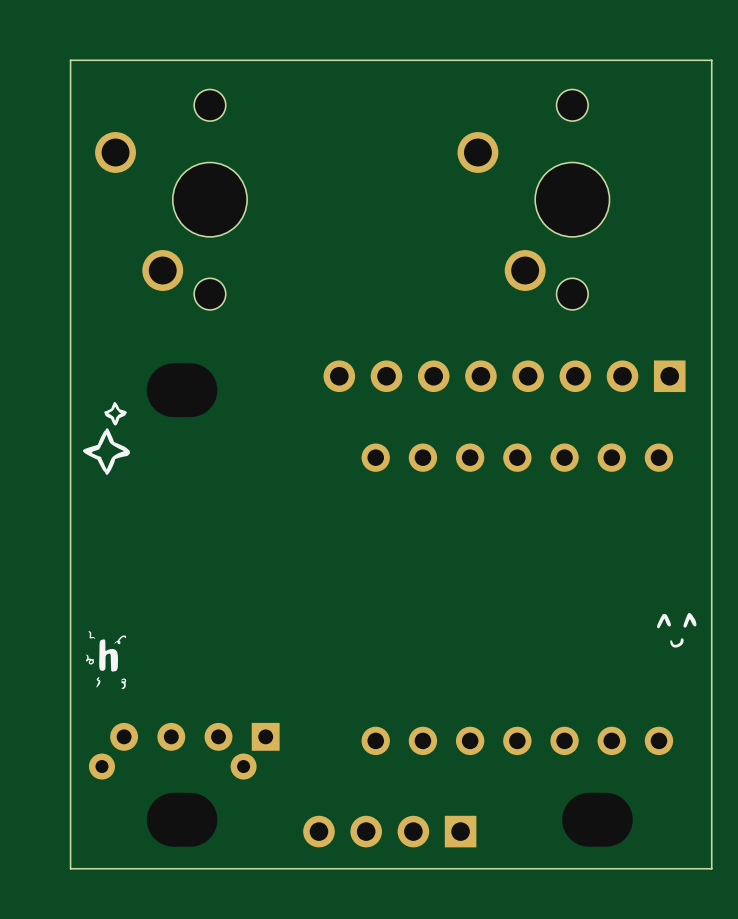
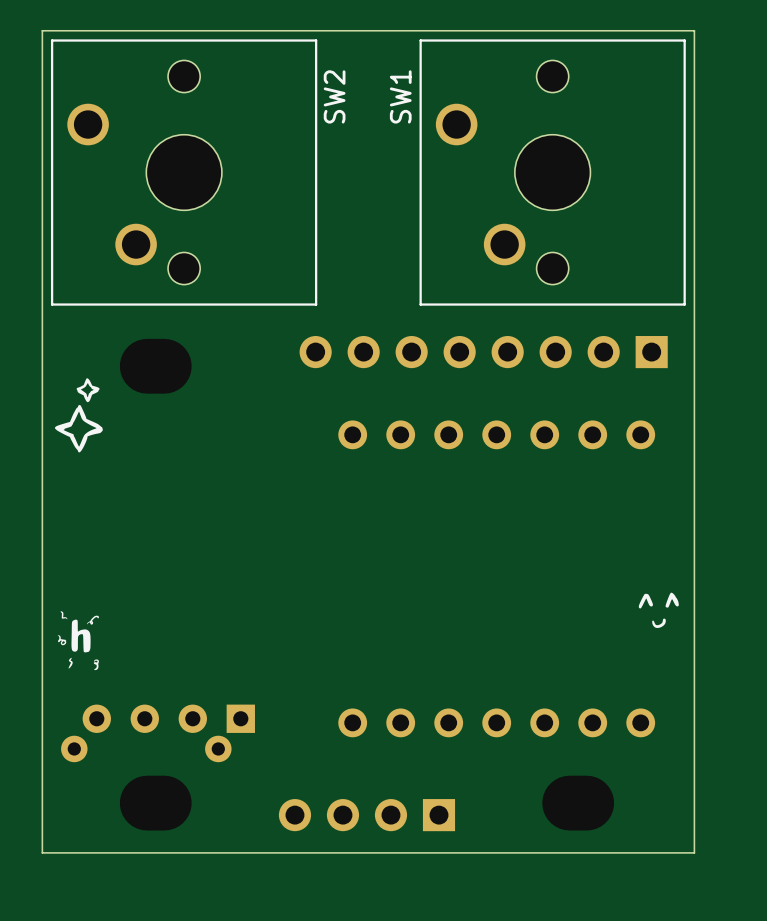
SW2: none -> (184, 172)
SW1: none -> (552, 172)

